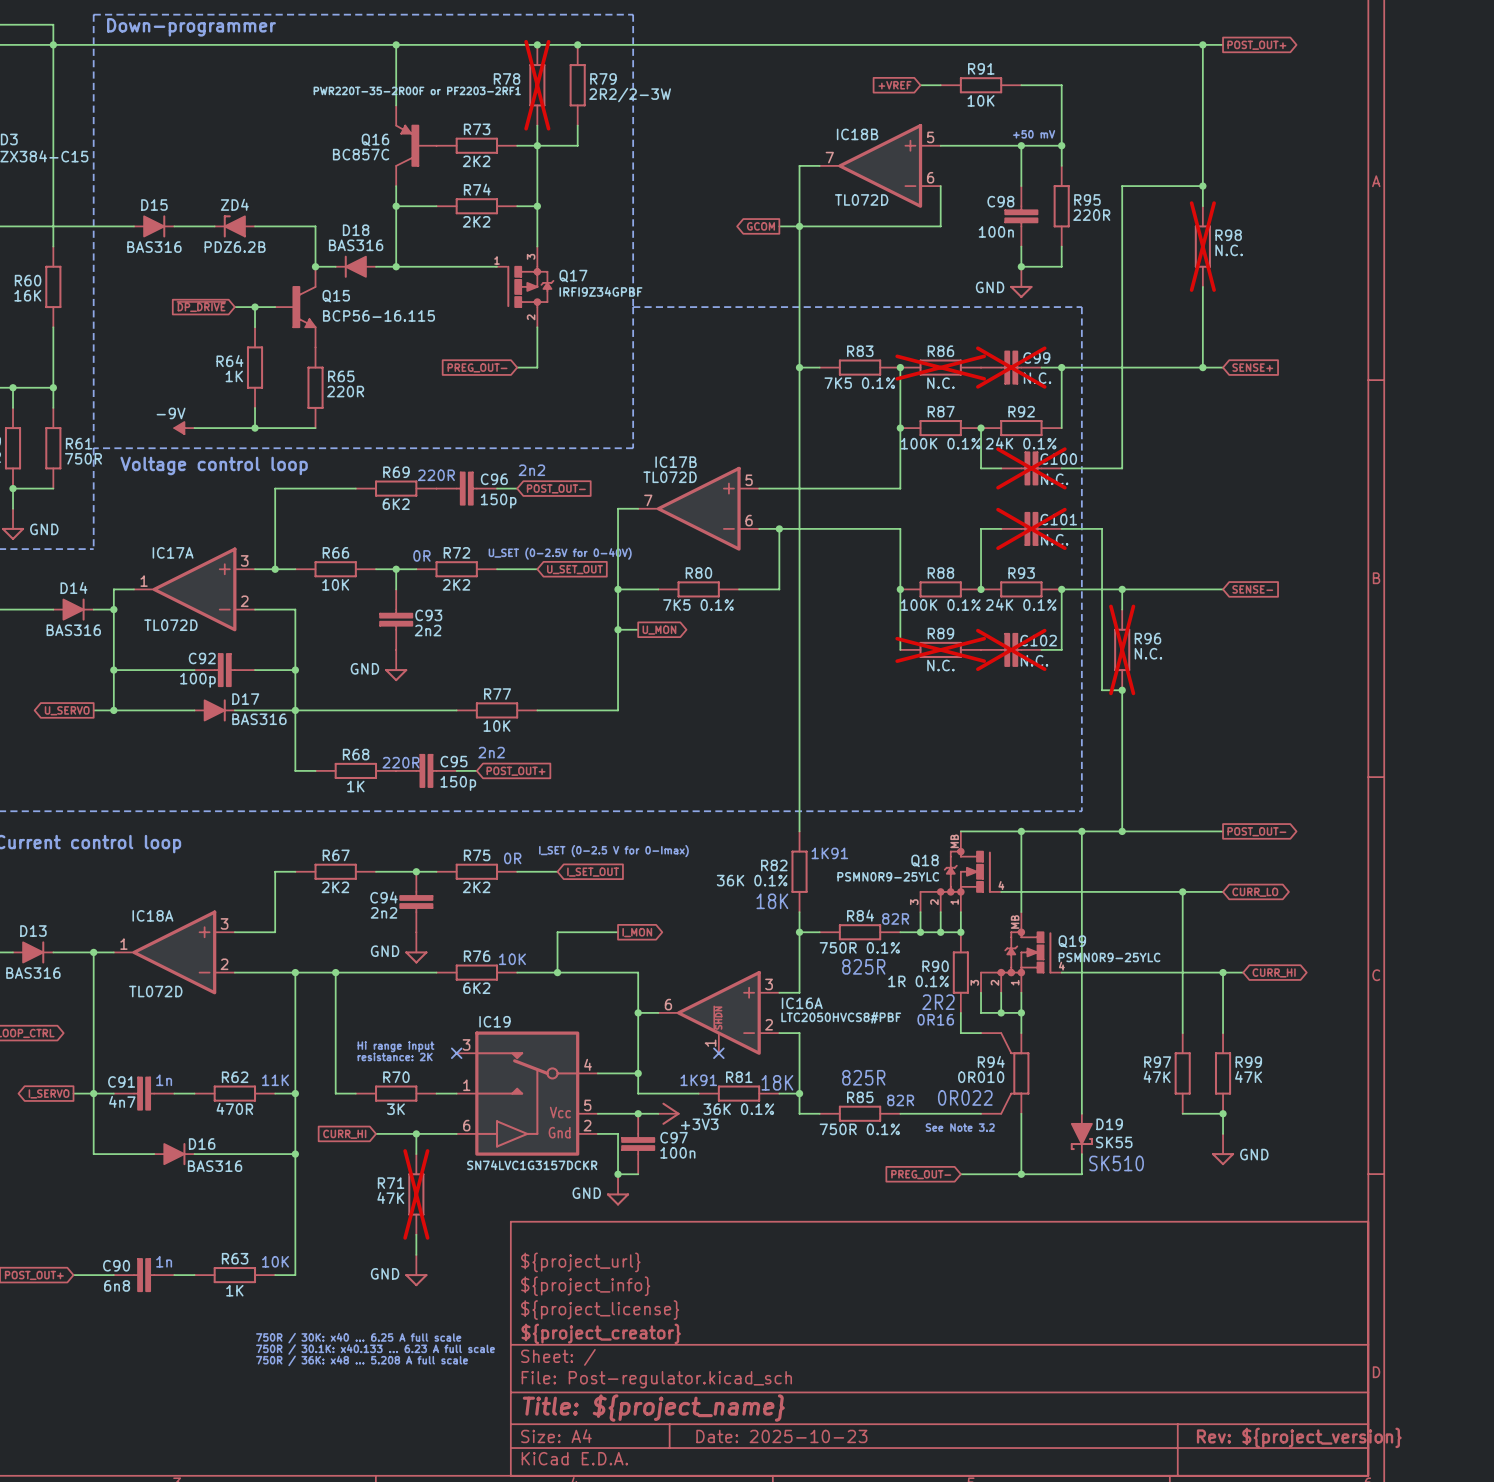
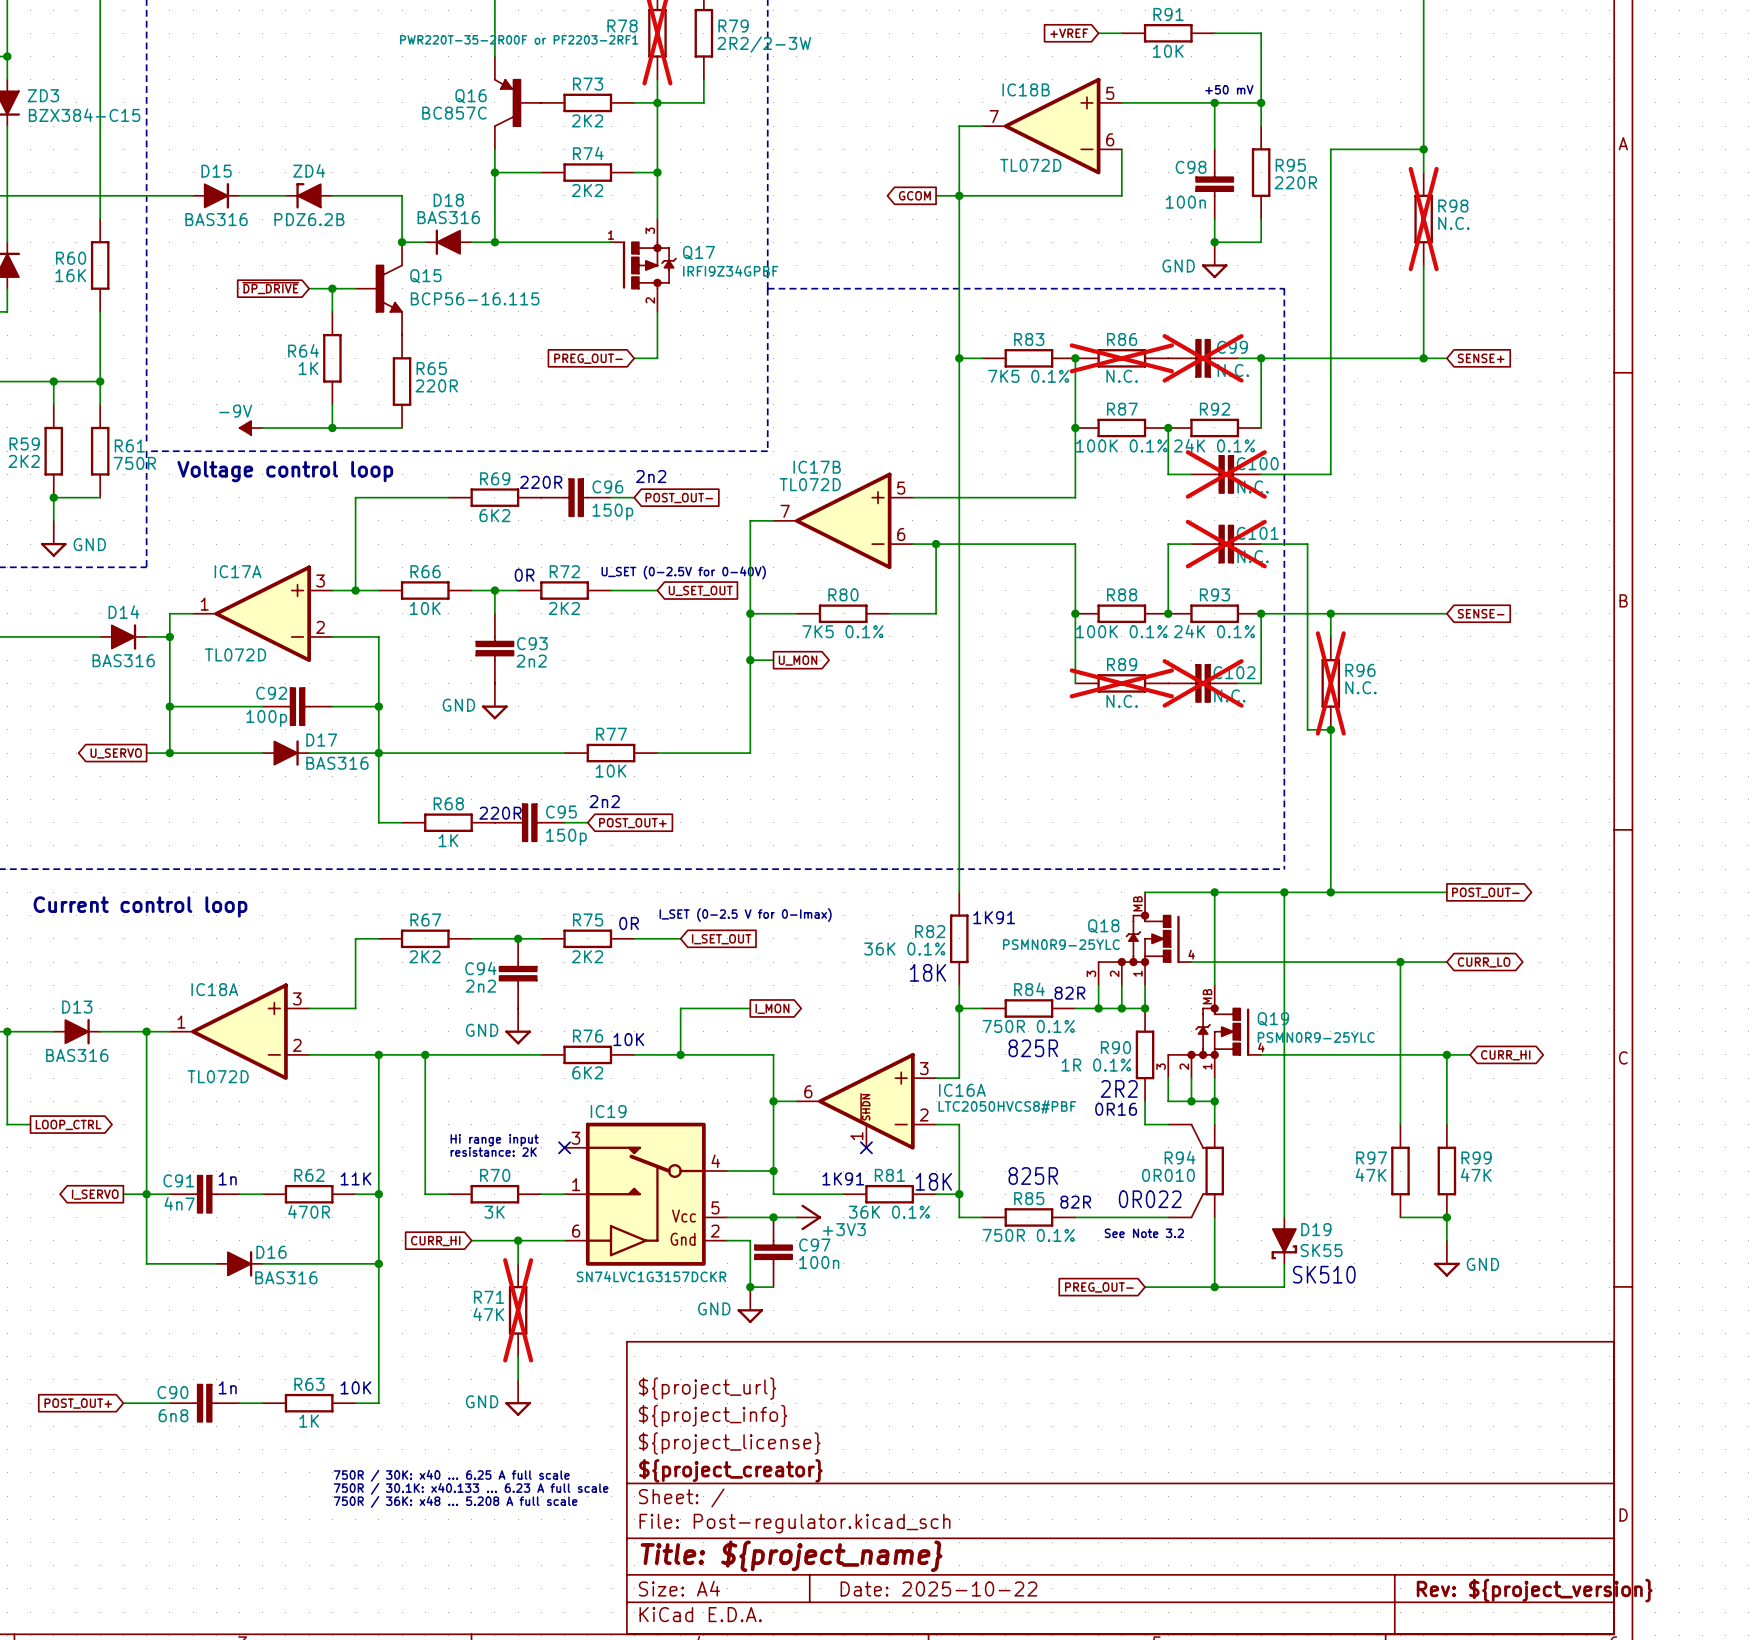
title block: Date: 2025-10-23 (781, 1436) -> Date: 2025-10-22 (938, 1588)

